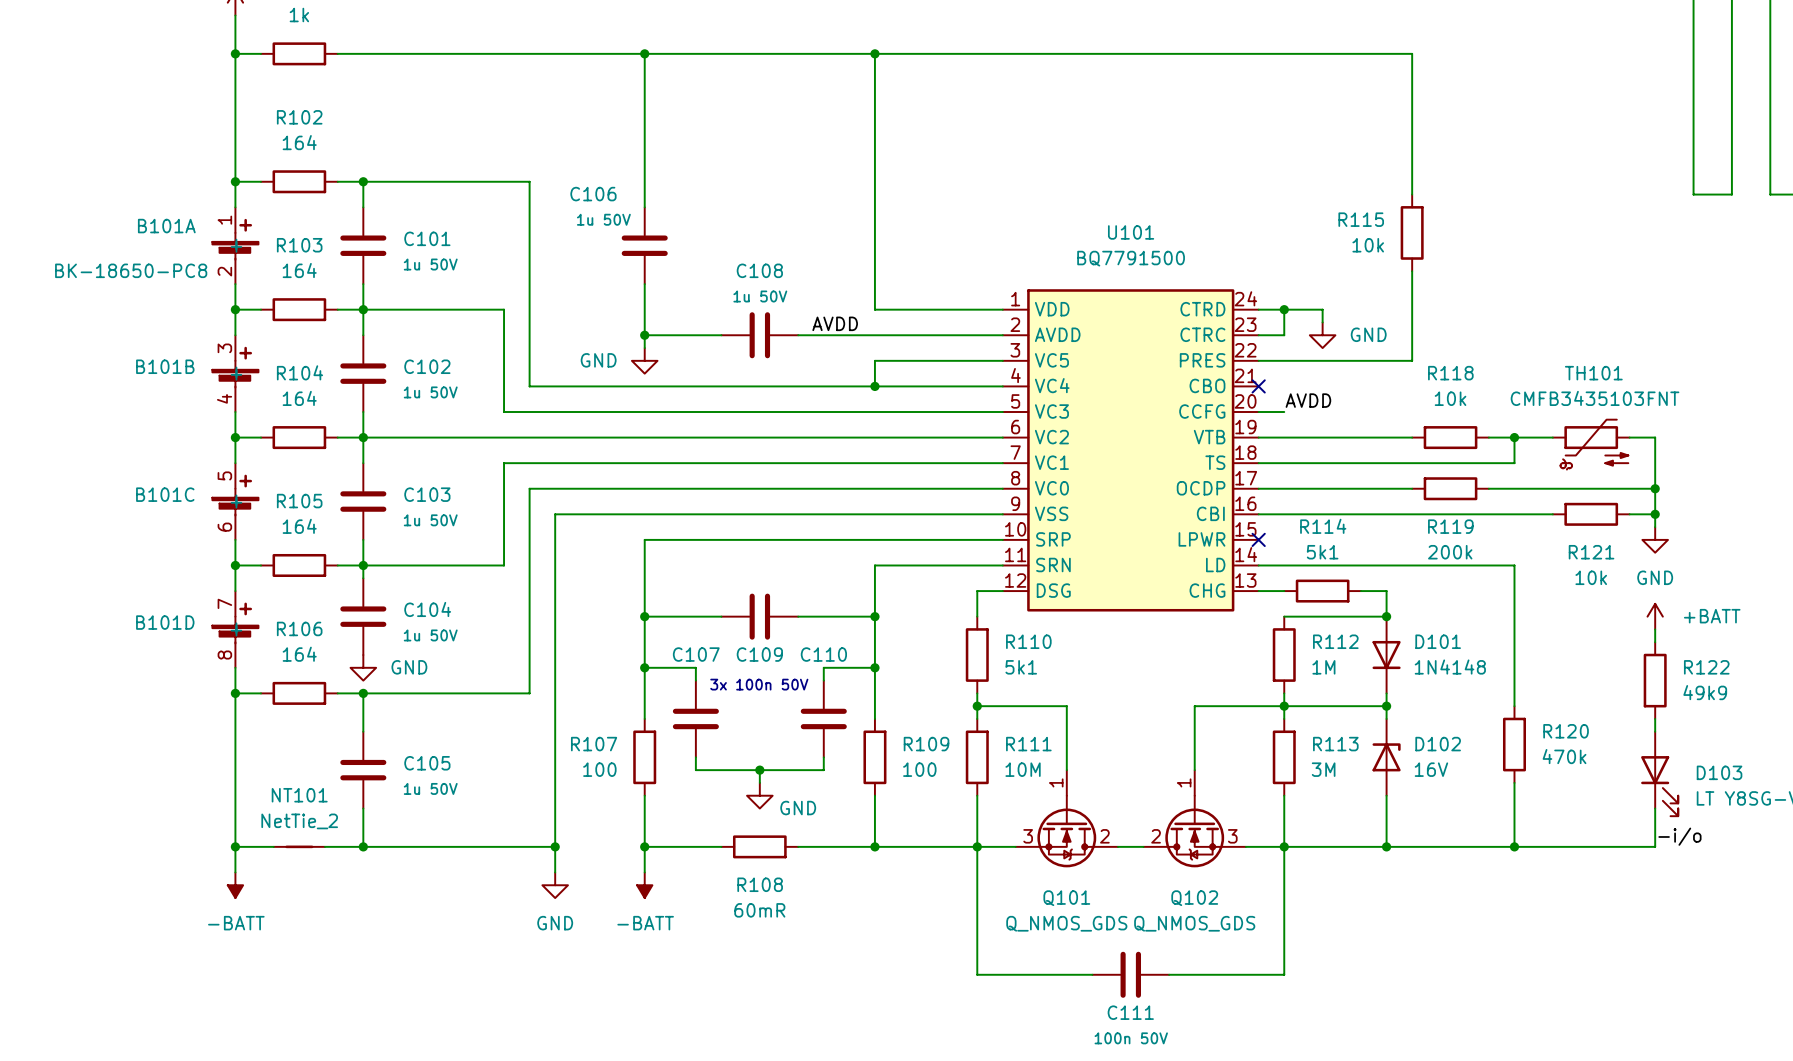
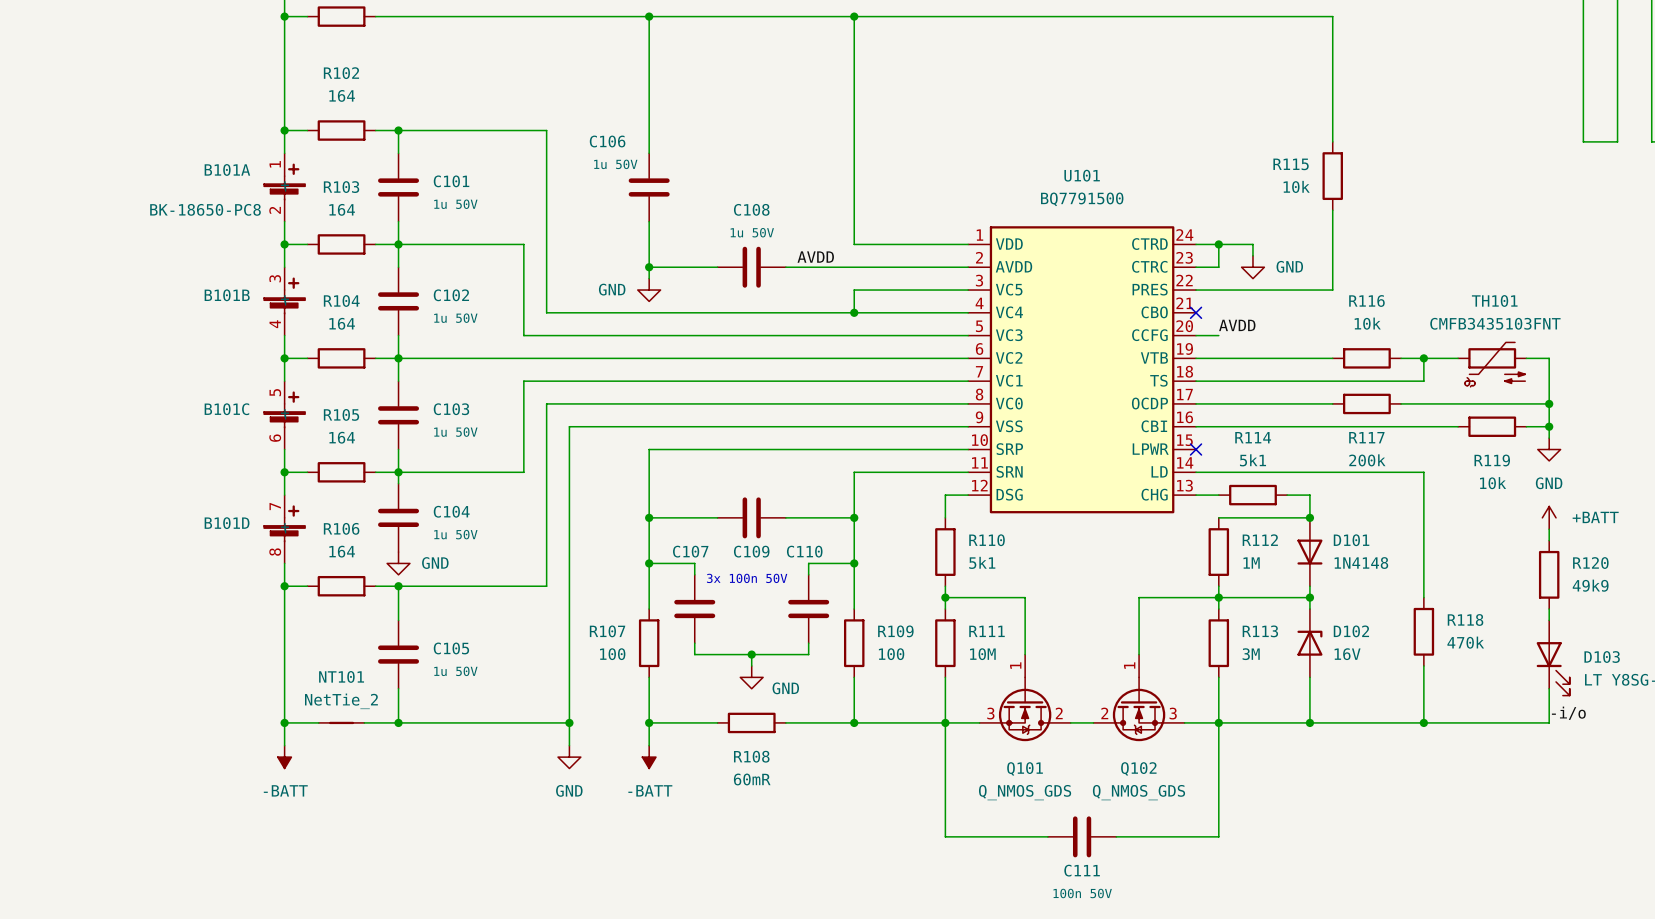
R118 name: R118 (1450, 373) -> R116 (1366, 300)
R119 name: R119 (1450, 526) -> R117 (1366, 437)
R121 name: R121 (1591, 552) -> R119 (1492, 460)
R122 name: R122 (1706, 667) -> R120 (1590, 563)
R120 name: R120 (1566, 731) -> R118 (1465, 619)

